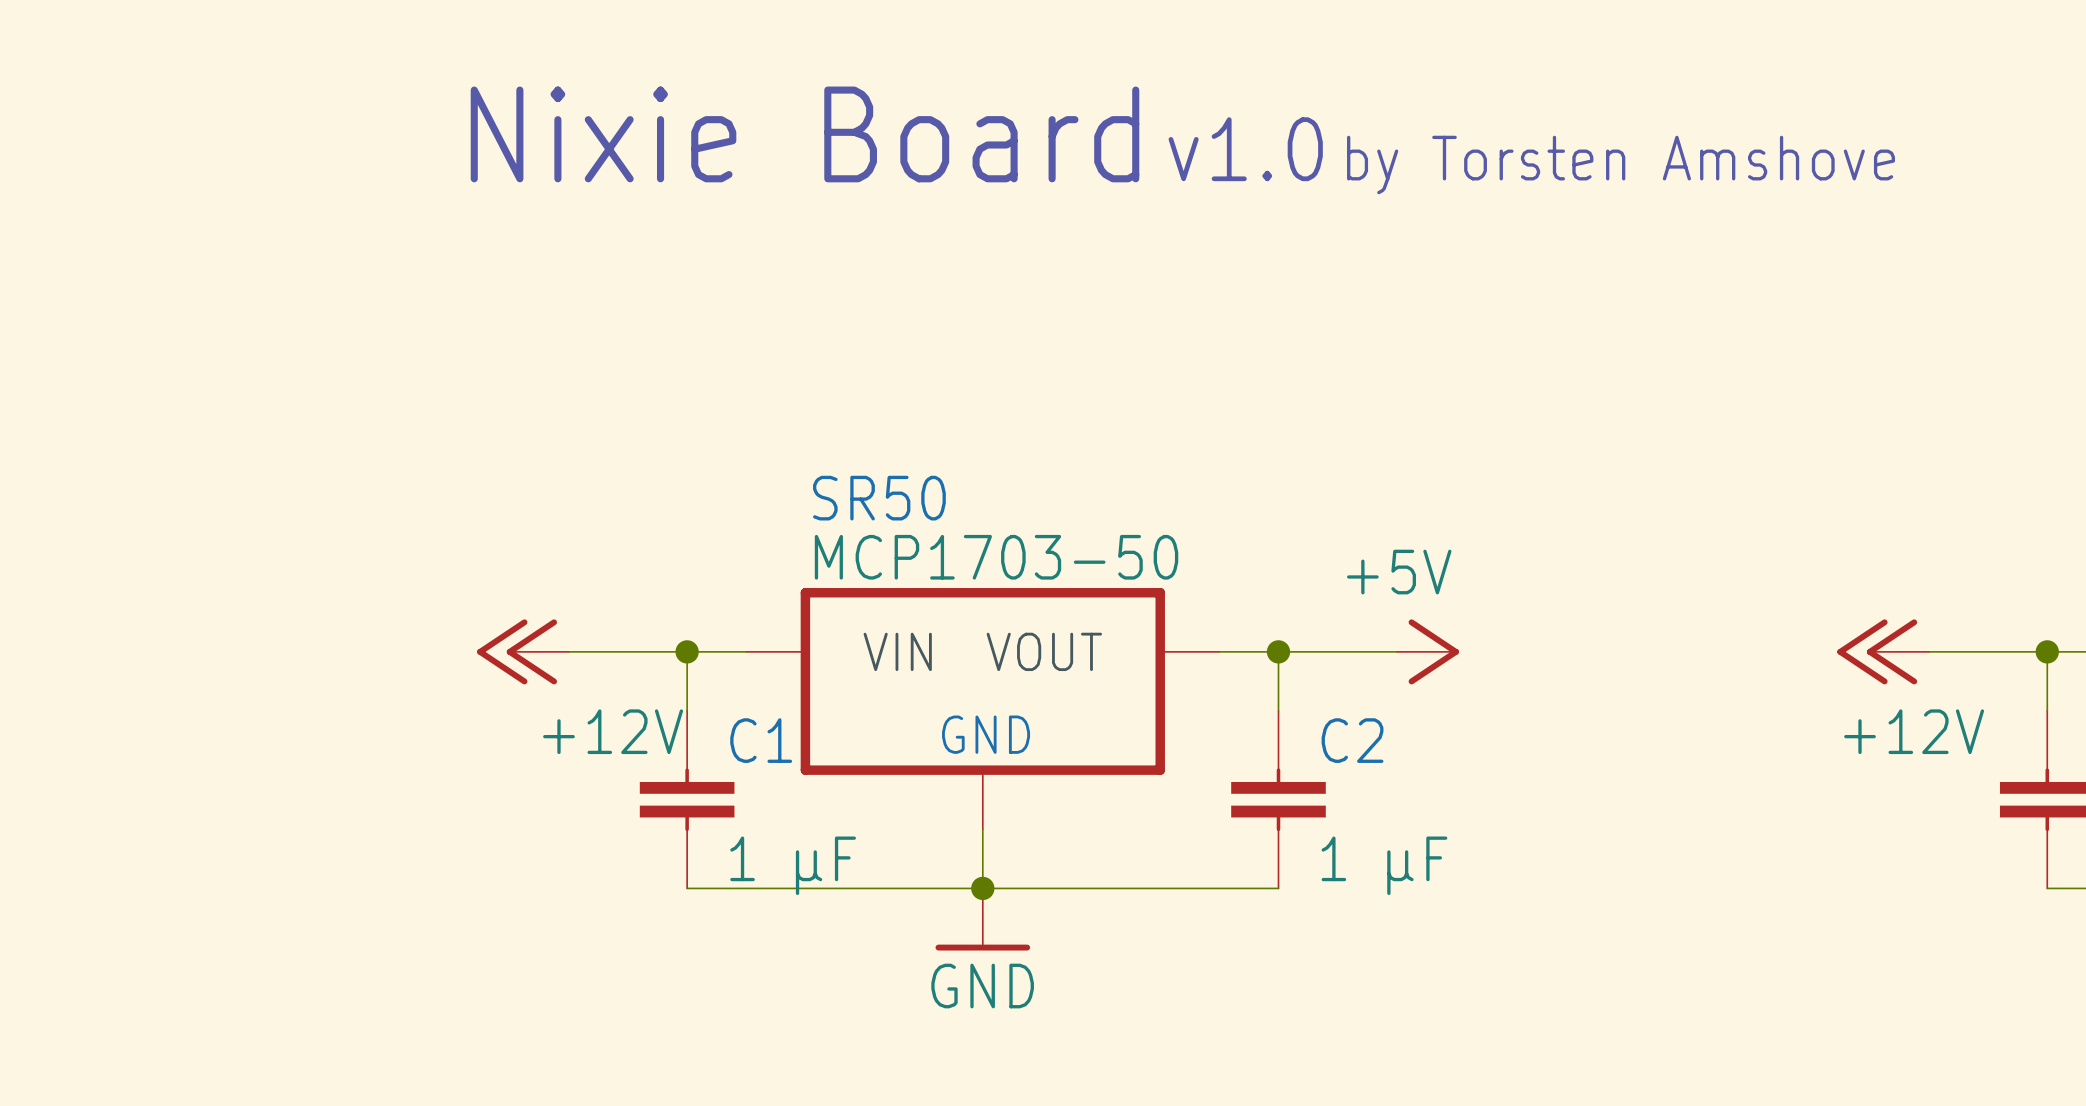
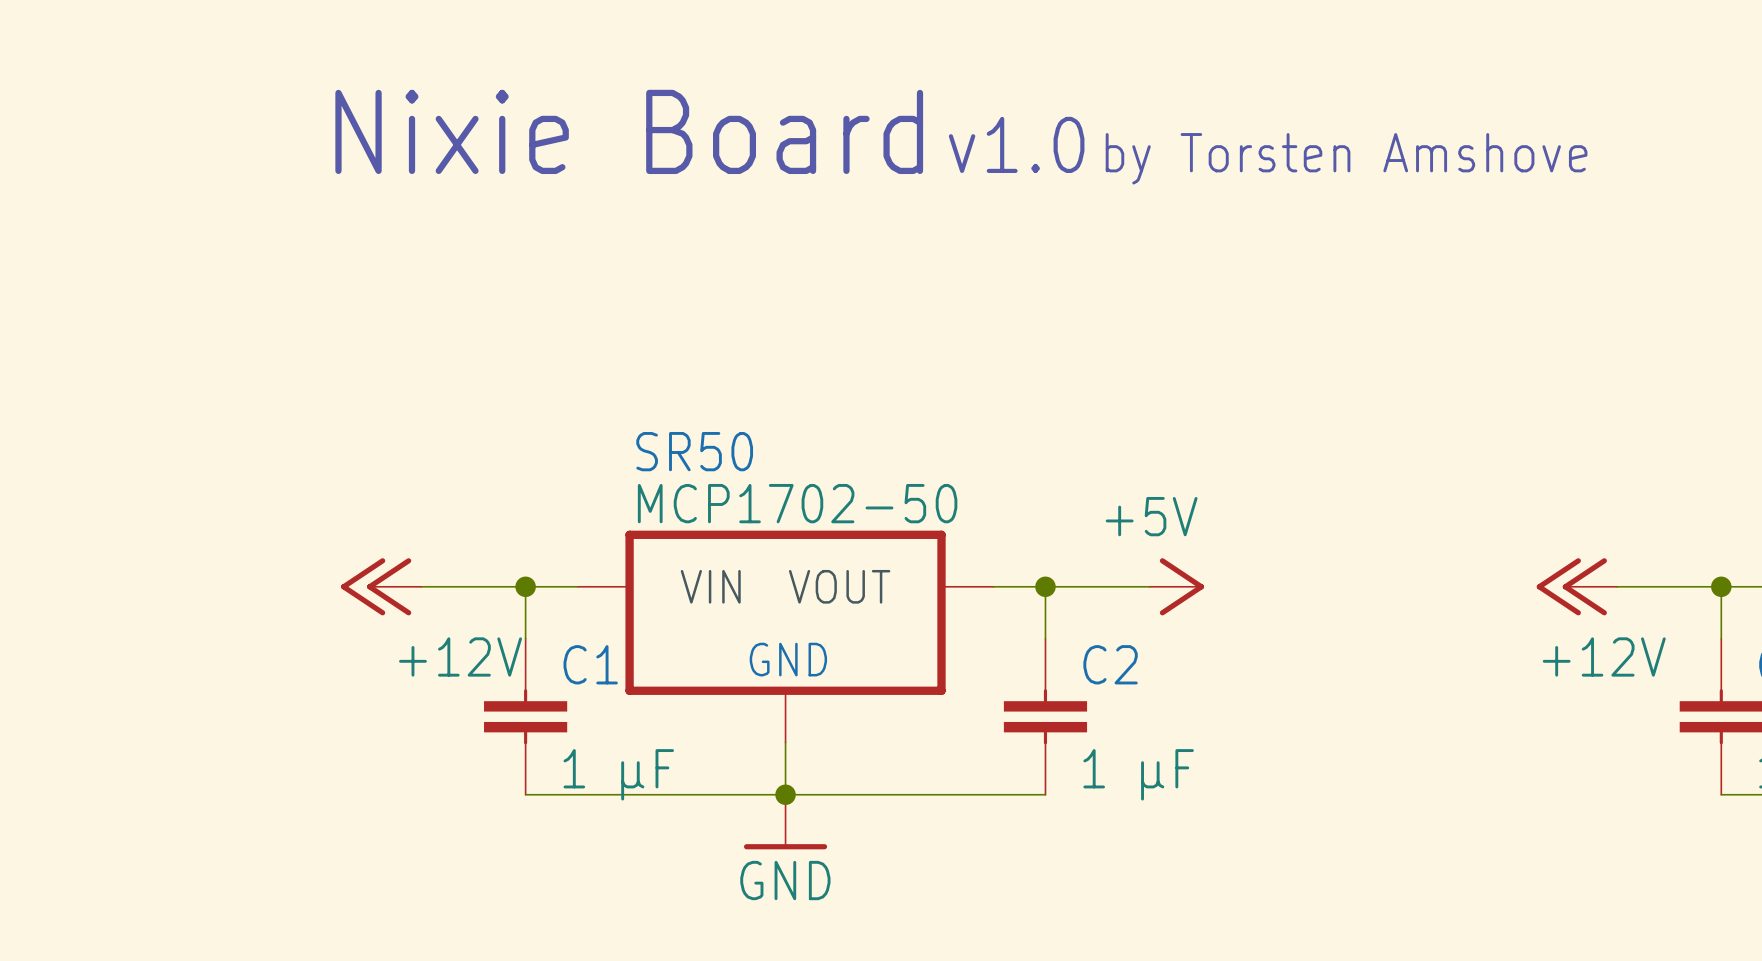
SR50 value: MCP1703-50 (996, 557) -> MCP1702-50 (797, 503)

